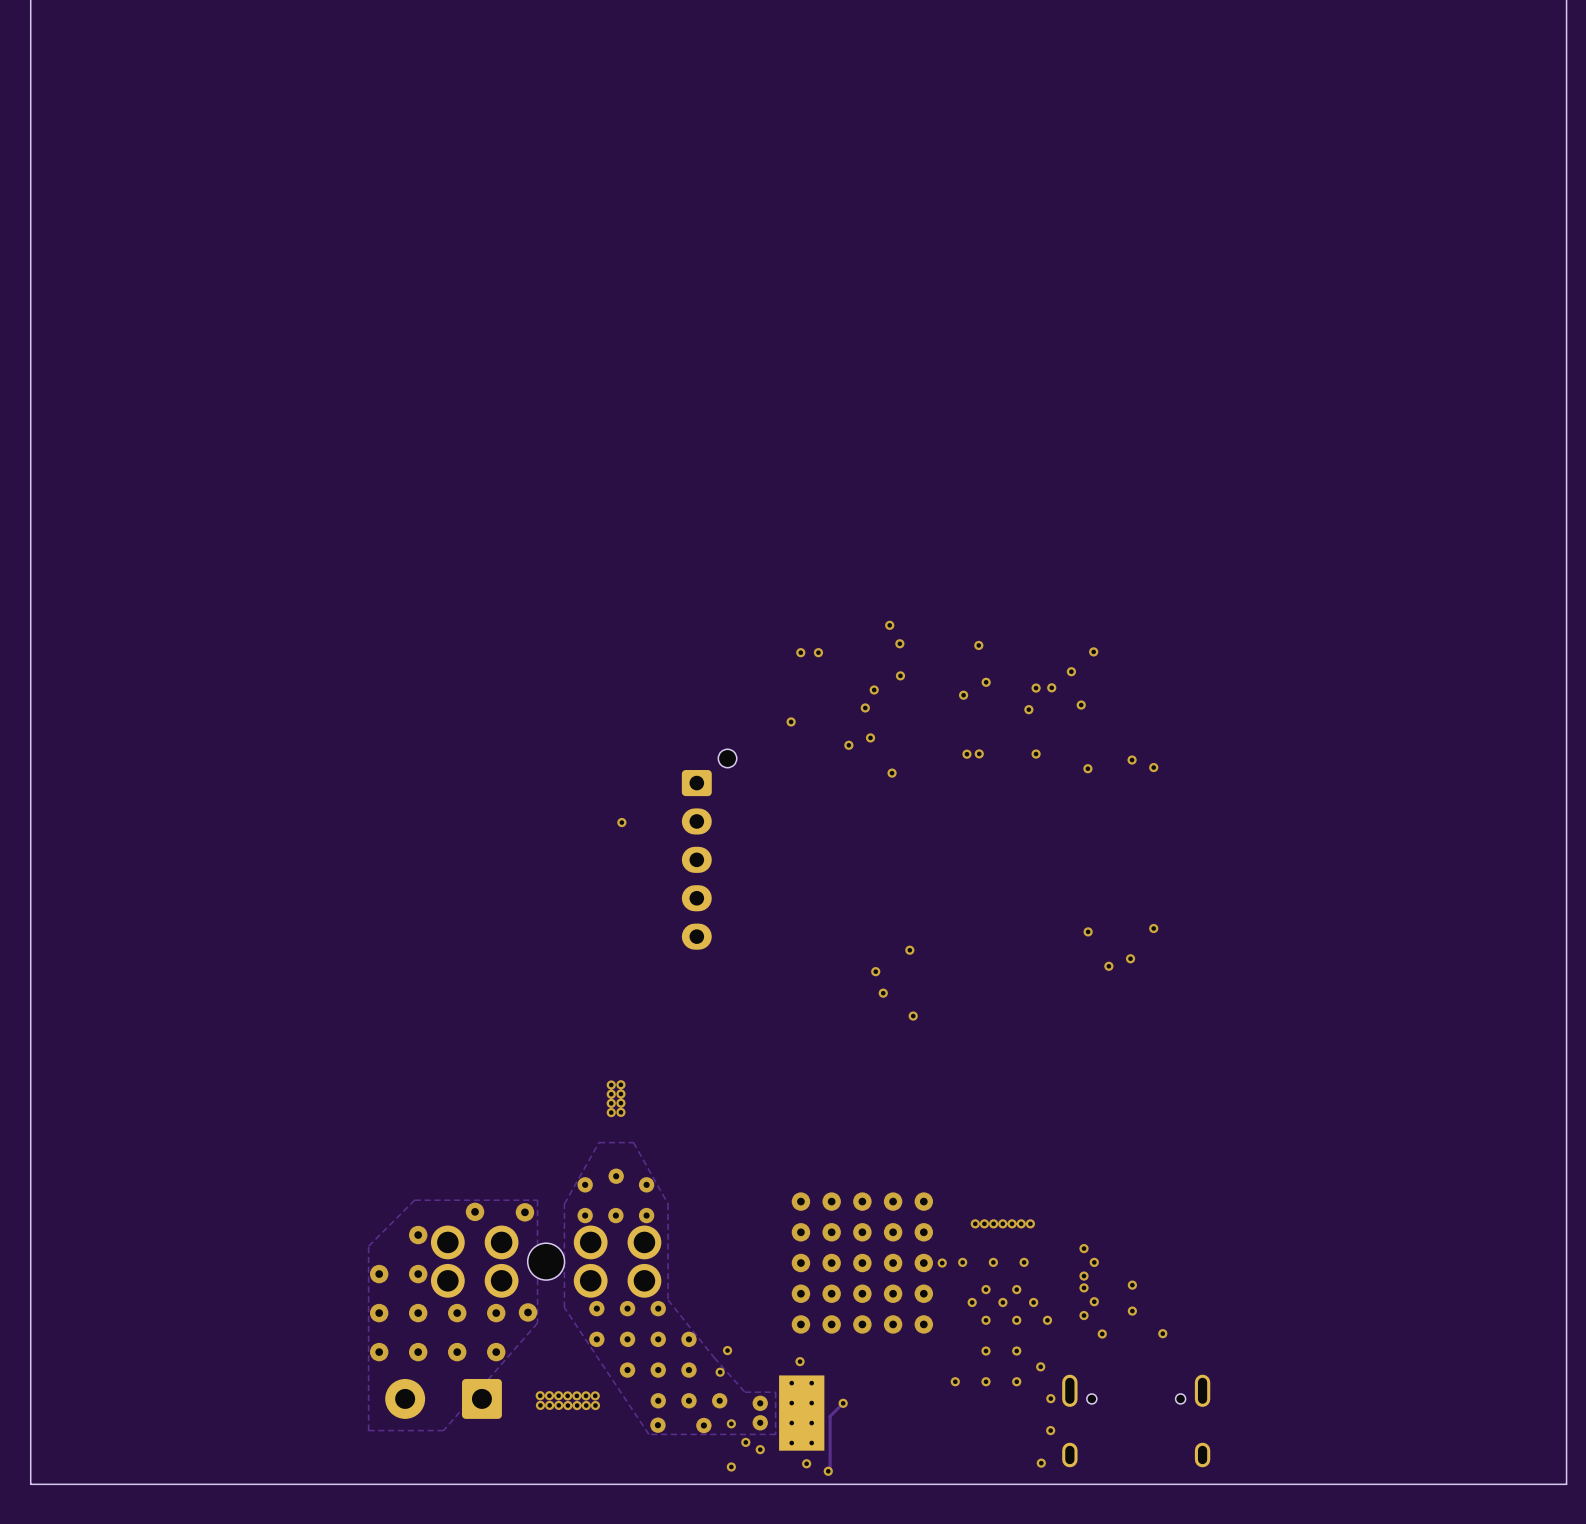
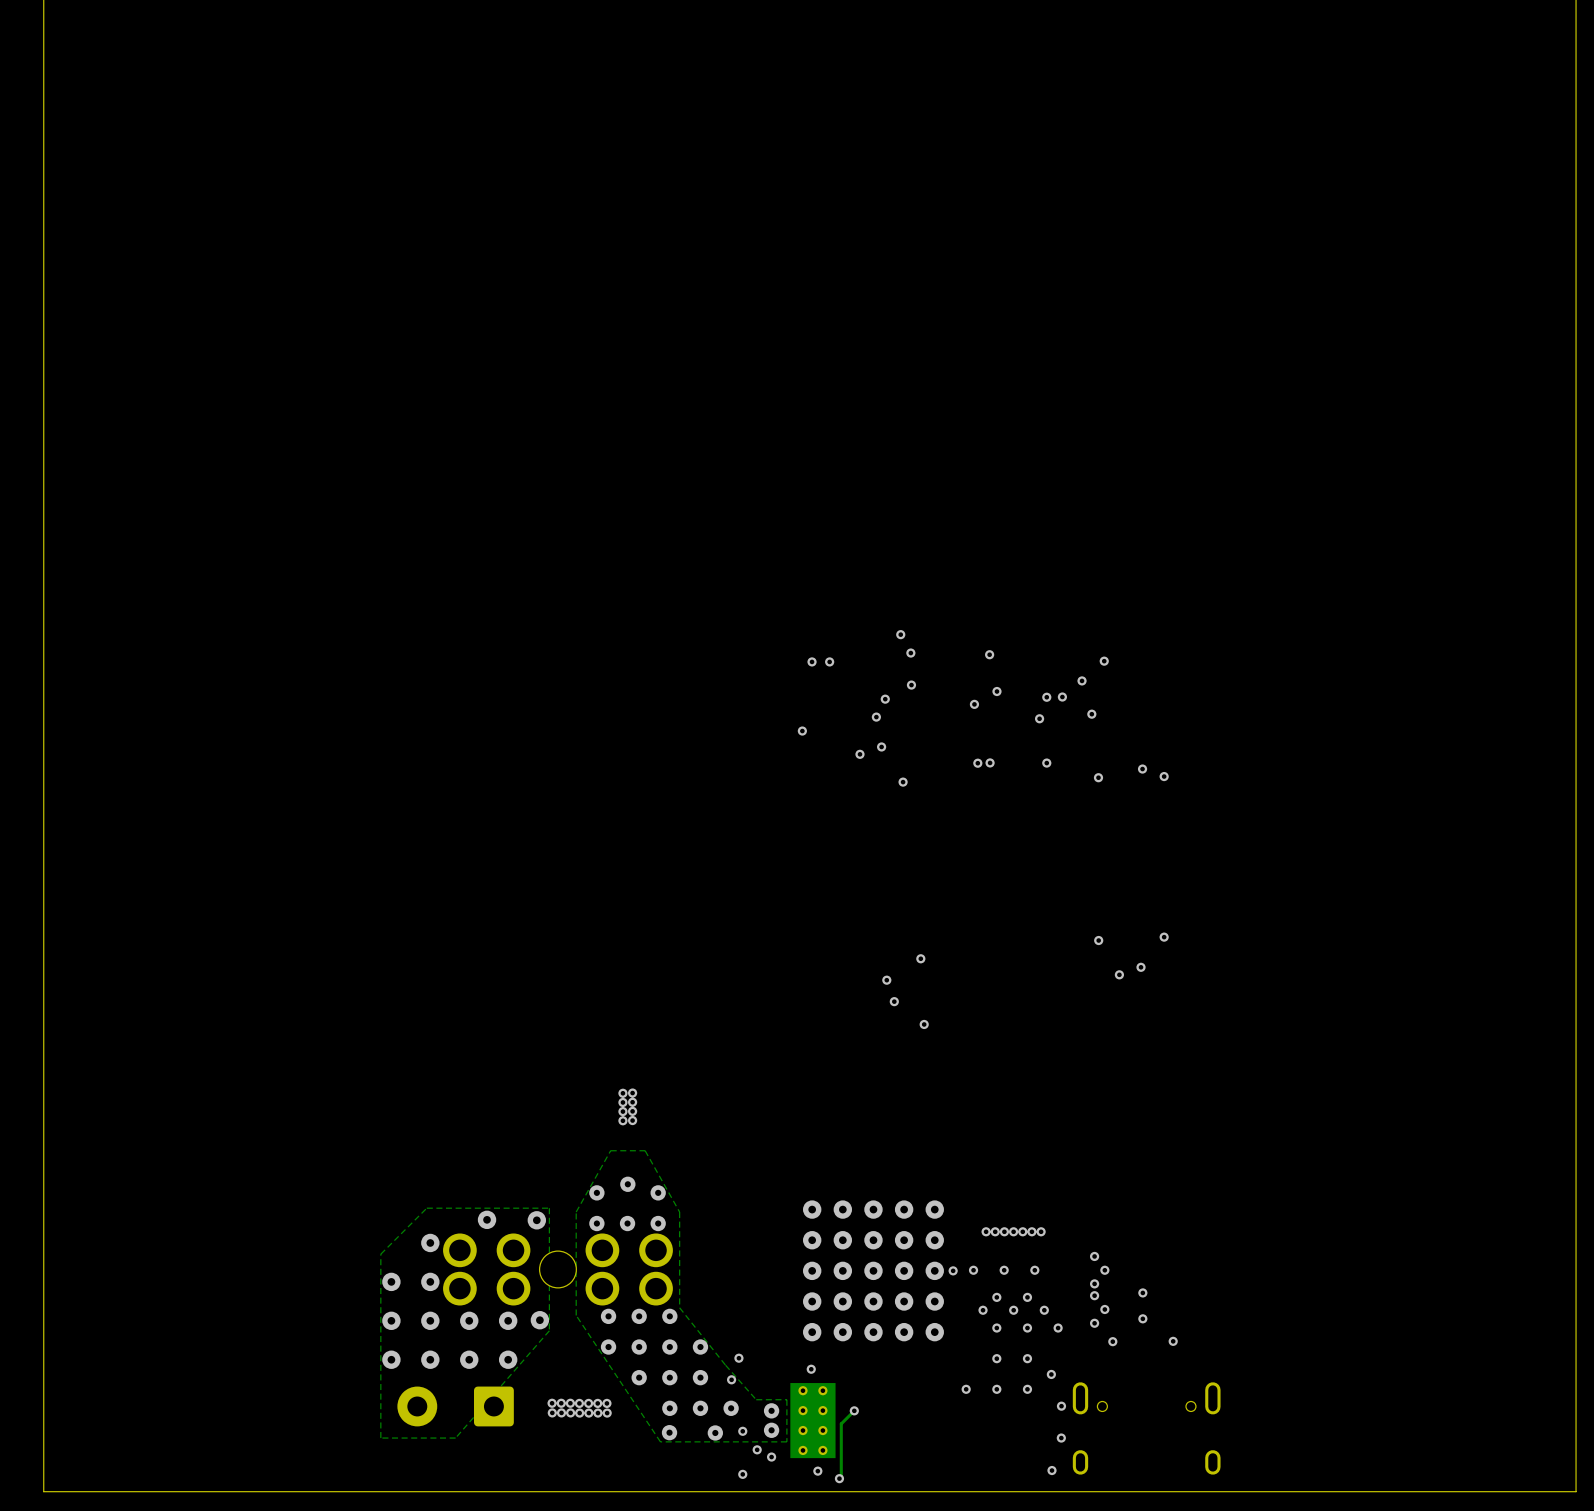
via: (621, 822) -> none
part: (709, 849) -> none

